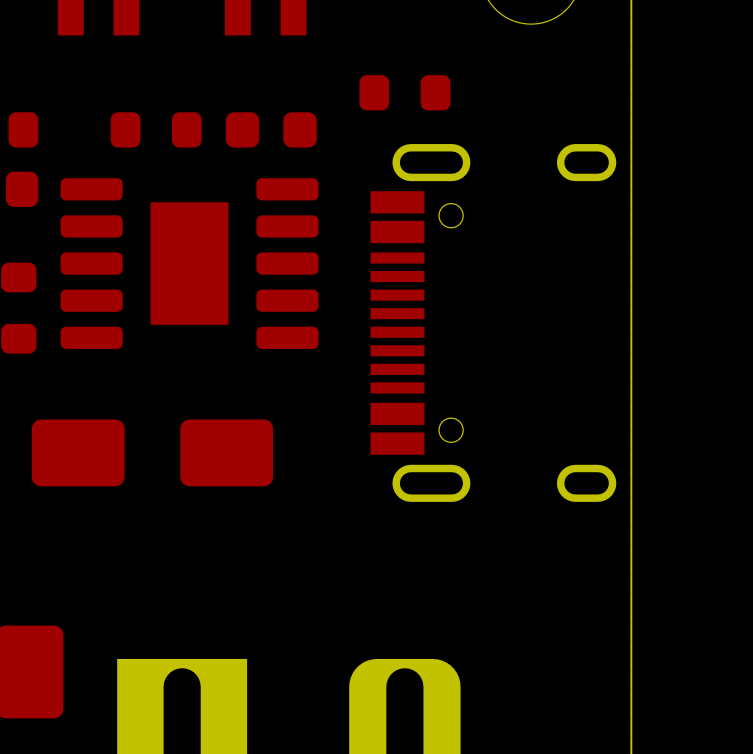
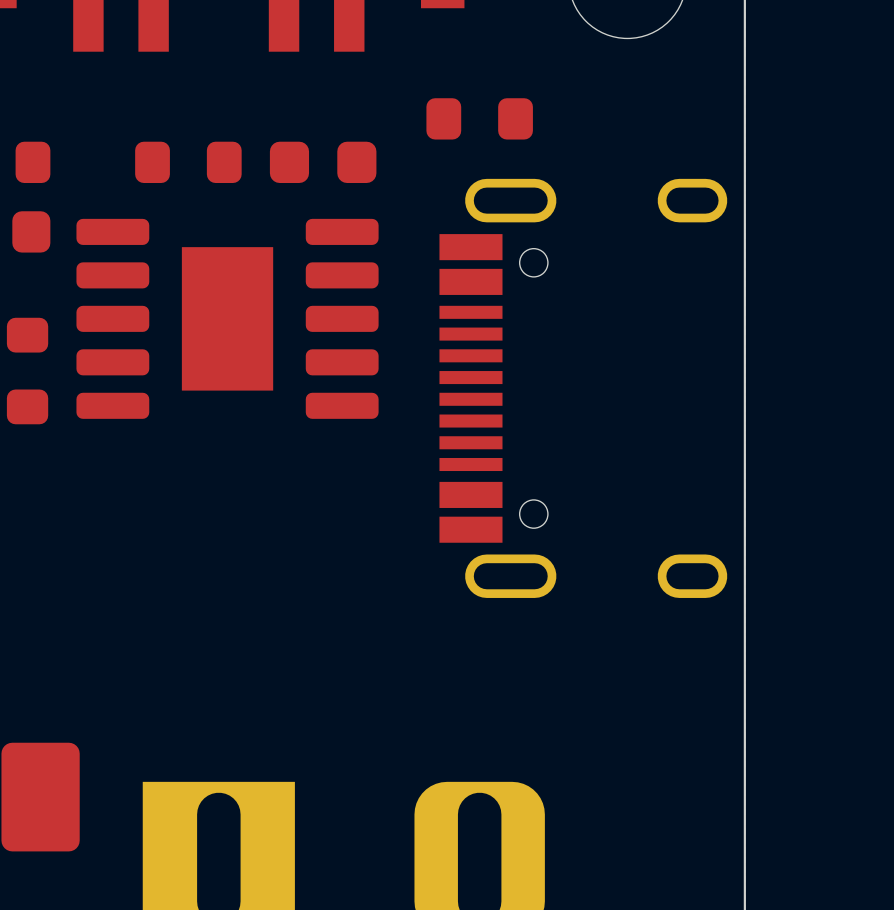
part: (152, 452) -> none

